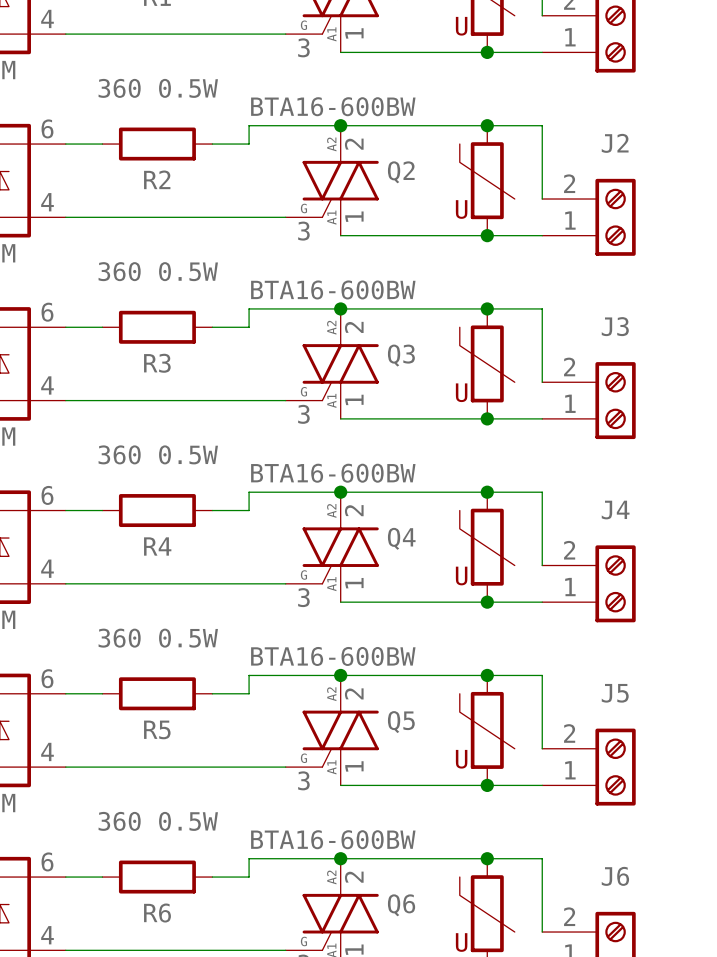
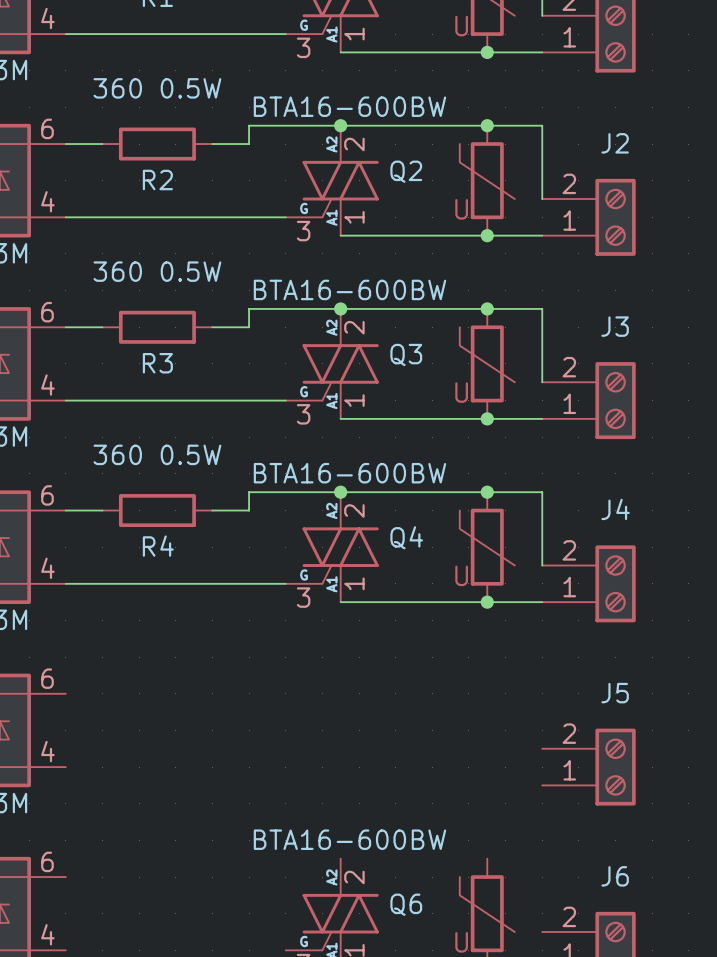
junction: (340, 675) -> none
junction: (487, 675) -> none
wire: (65, 693) (102, 693) -> none
R5: 360 0.5W (157, 693) -> none
wire: (212, 693) (249, 693) (249, 675) (542, 675) (542, 748) -> none
Q5: BTA16-600BW (332, 730) -> none
part: (487, 730) -> none
wire: (65, 767) (285, 767) -> none
wire: (340, 785) (542, 785) -> none
junction: (487, 785) -> none
junction: (340, 858) -> none
junction: (487, 858) -> none
wire: (65, 877) (102, 877) -> none
R6: 360 0.5W (157, 877) -> none
wire: (212, 877) (249, 877) (249, 858) (542, 858) (542, 932) -> none
wire: (65, 950) (285, 950) -> none

